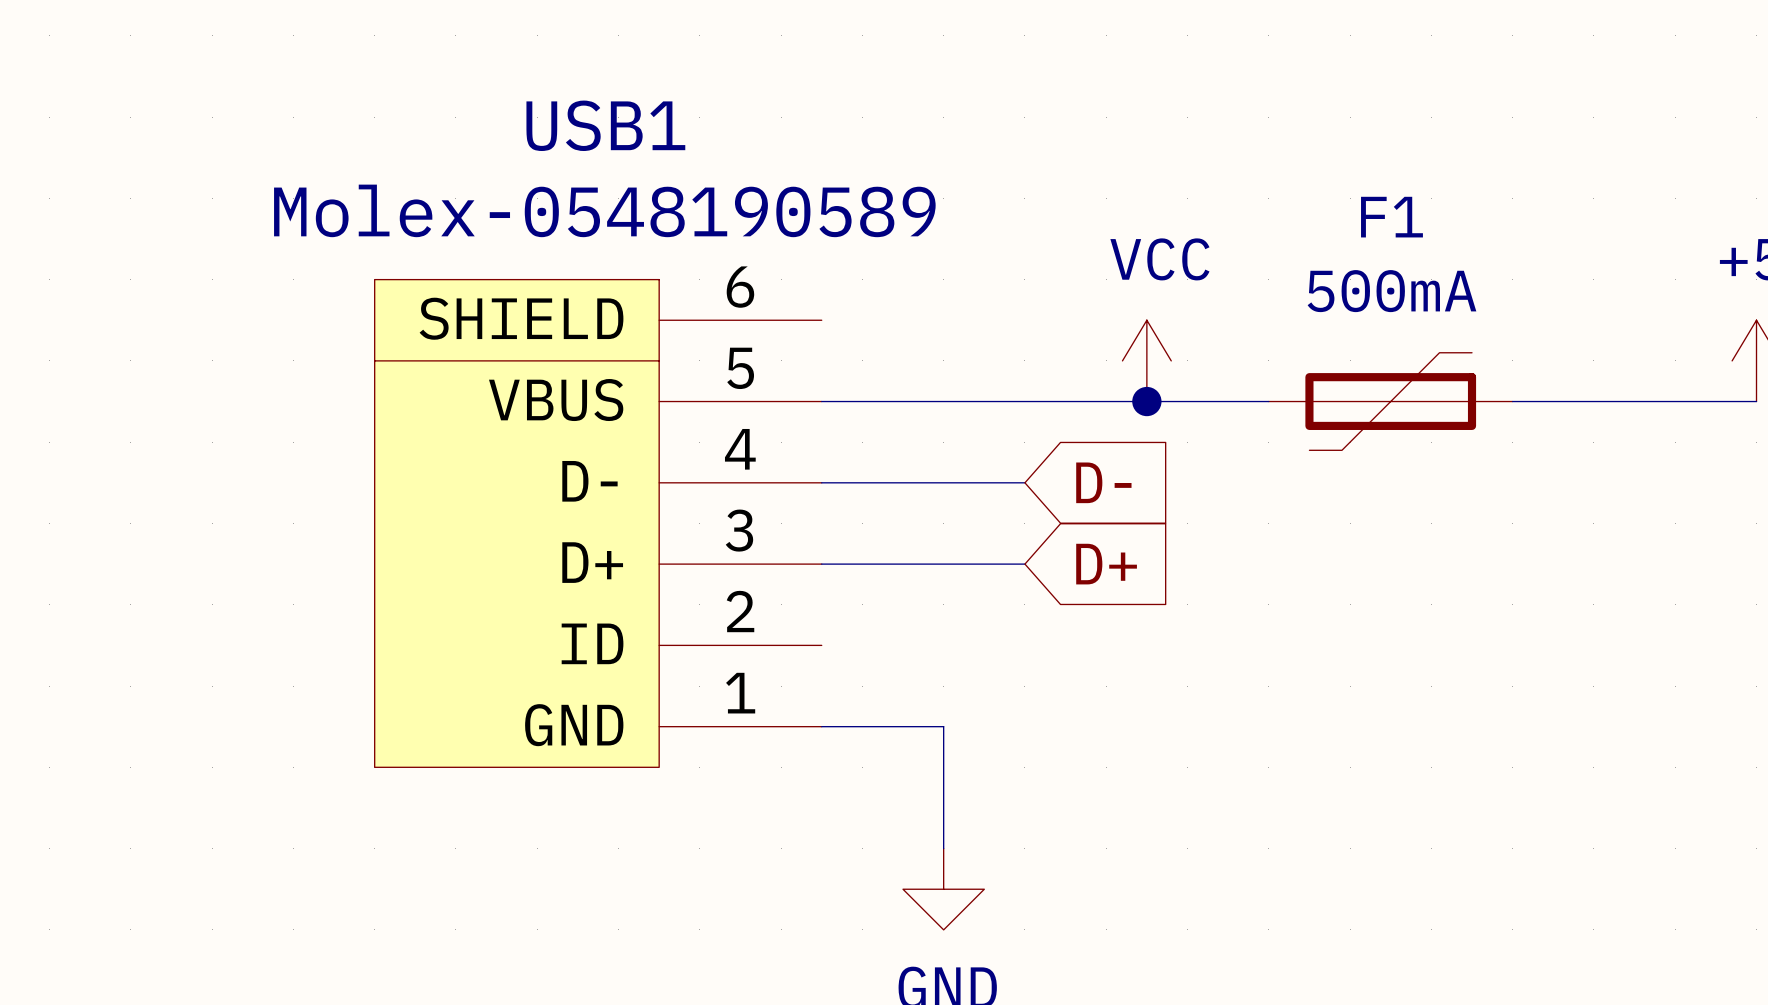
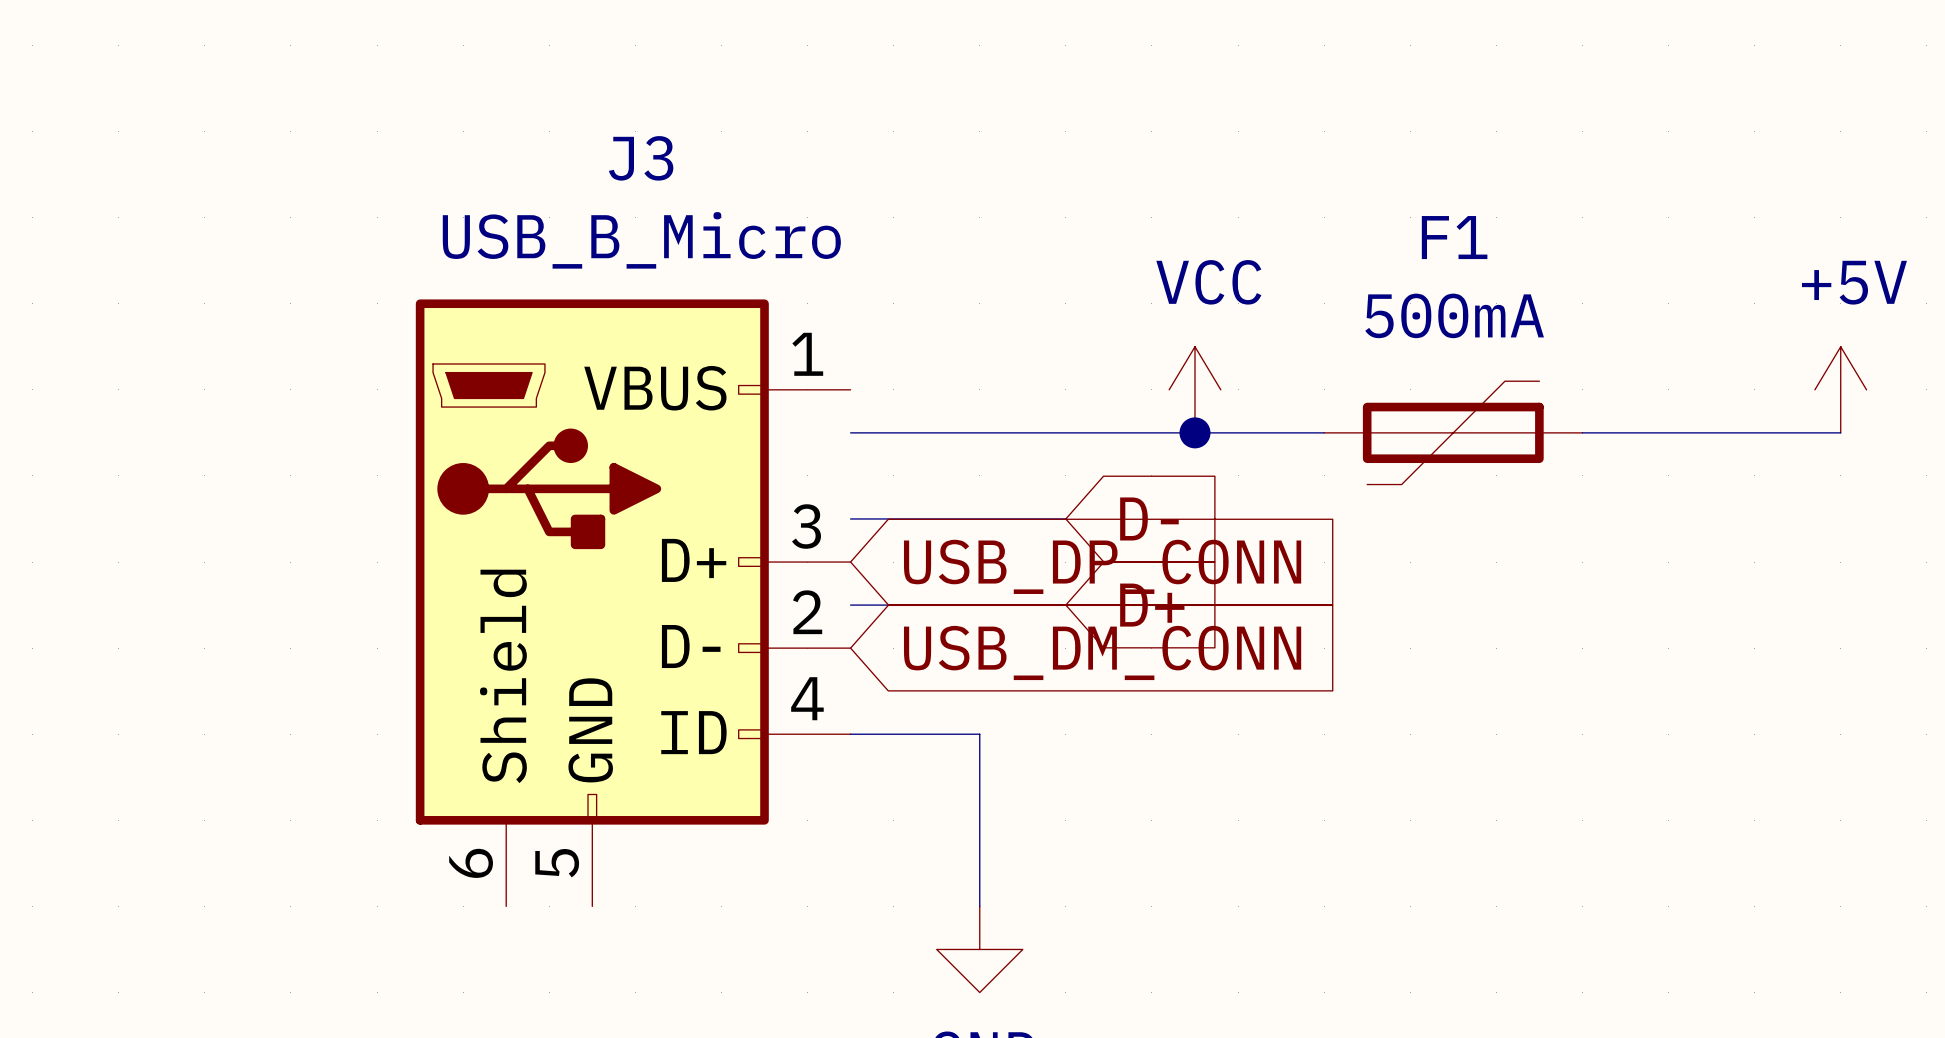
USB1: Molex-0548190589 (598, 523) -> none
global label: none -> USB_DP_CONN (1102, 566)
J3: none -> USB_B_Micro (633, 602)
global label: none -> USB_DM_CONN (1102, 652)
wire: (821, 726) (943, 726) -> (850, 734) (979, 734) (979, 777)

